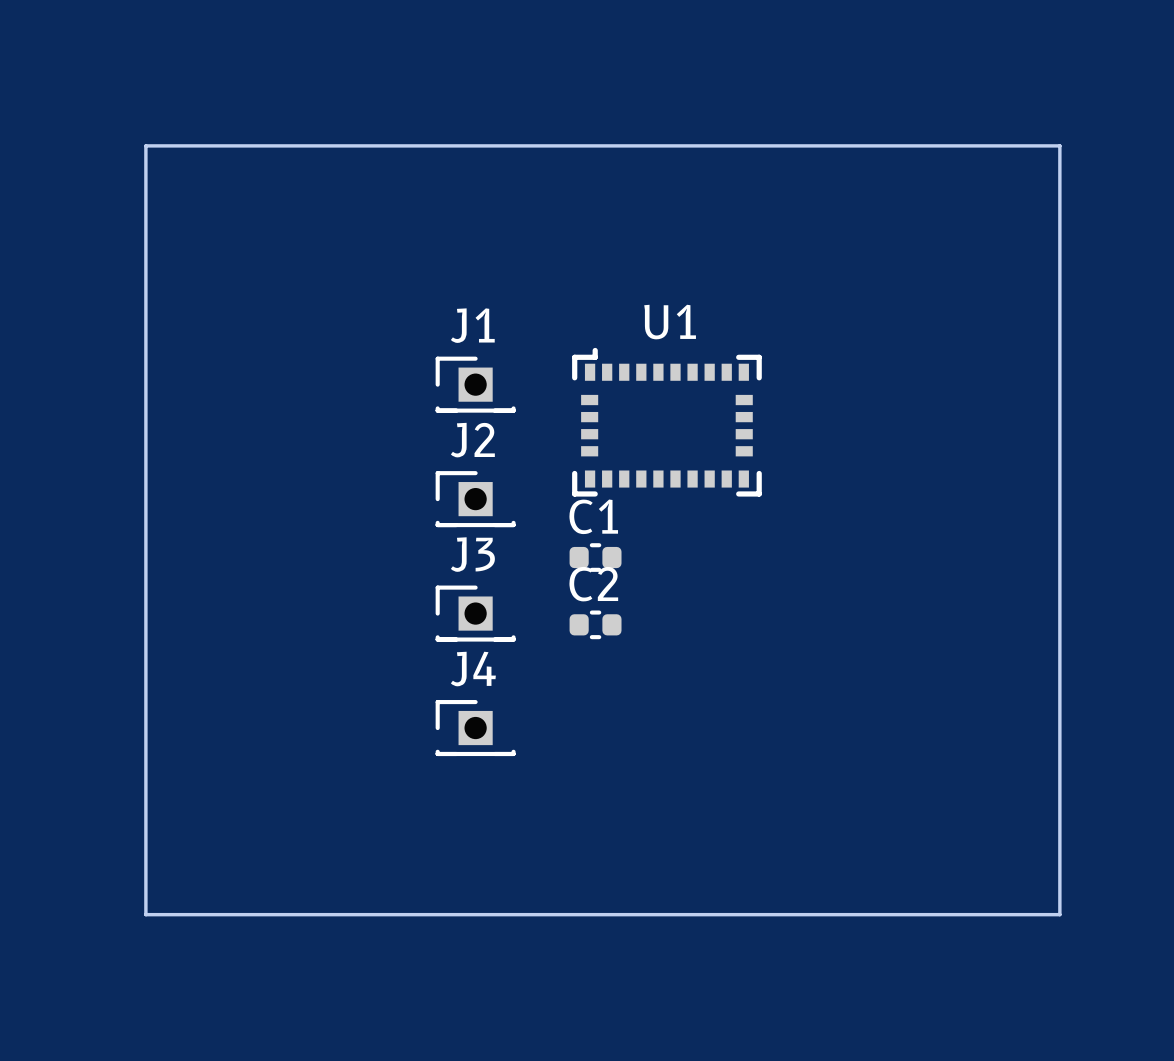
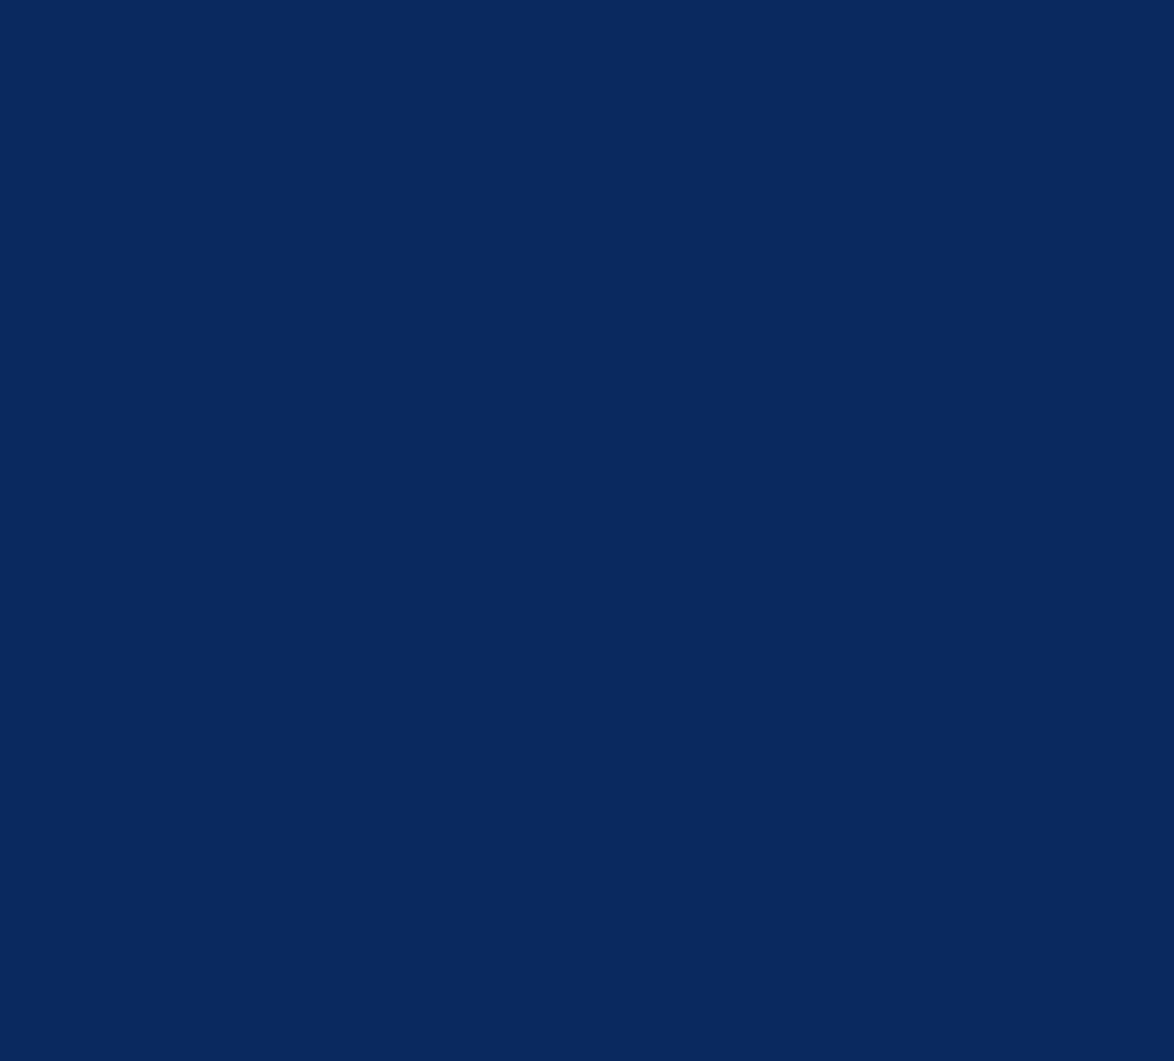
board edge: (145, 145) (1059, 145) (1059, 914) (145, 914) (145, 145) -> none
J1: (475, 384) -> none
U1: (666, 422) -> none
J2: (475, 499) -> none
C1: (595, 557) -> none
J3: (475, 613) -> none
C2: (595, 624) -> none
J4: (475, 728) -> none

